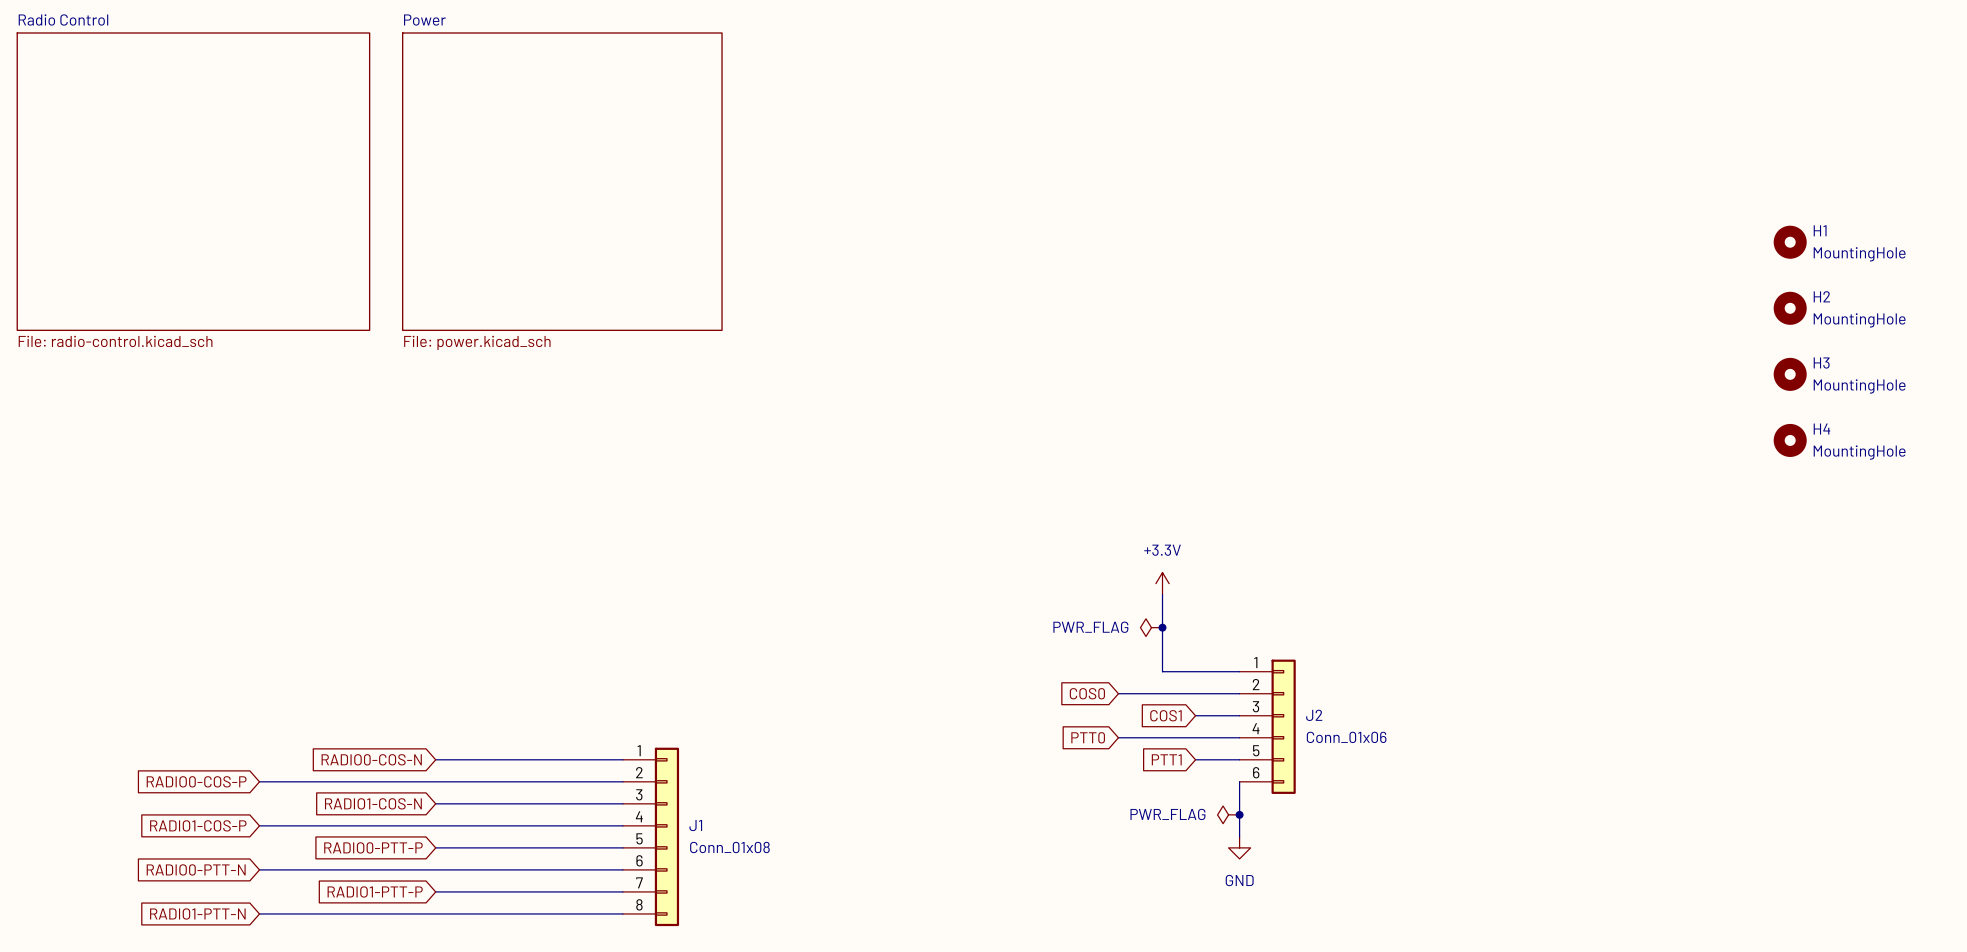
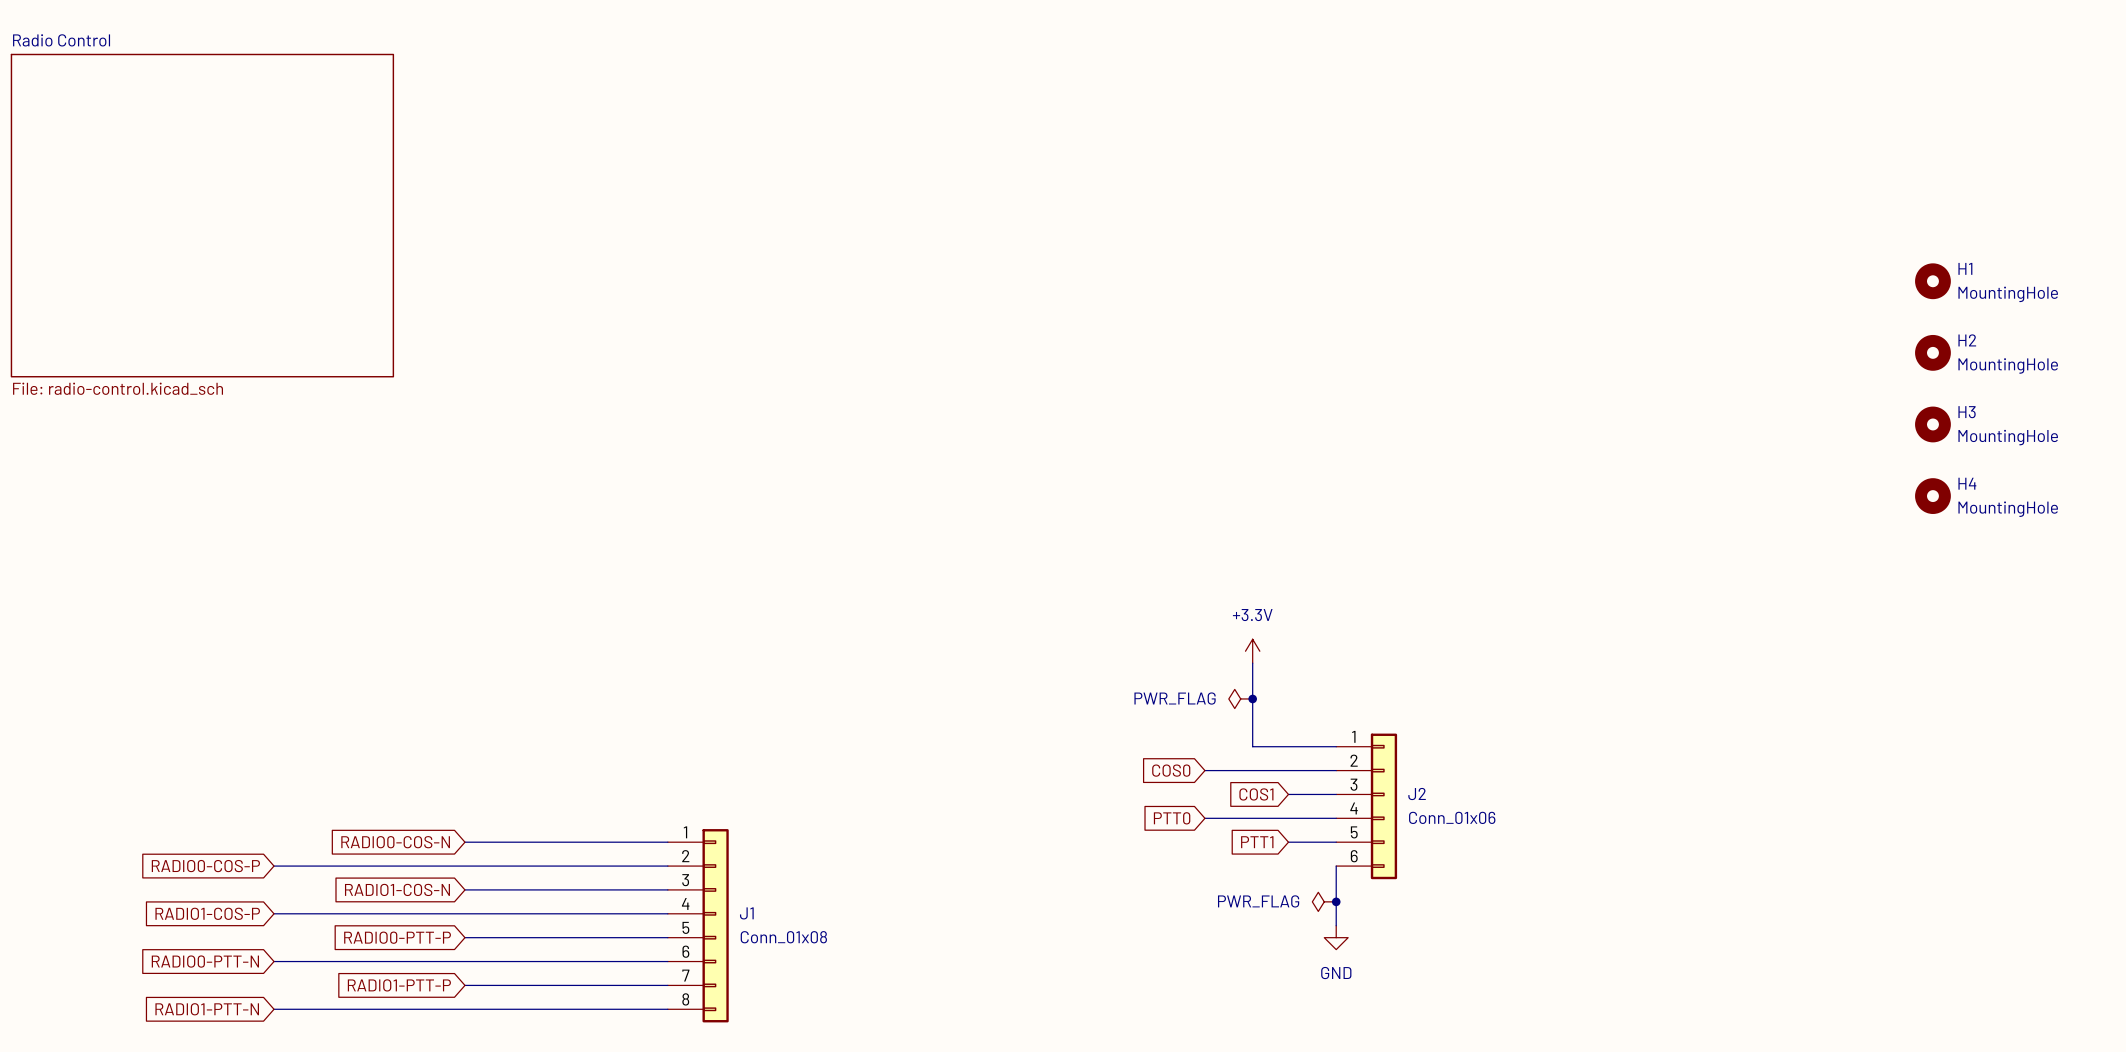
sheet Power: File: power.kicad_sch (562, 181) -> none

